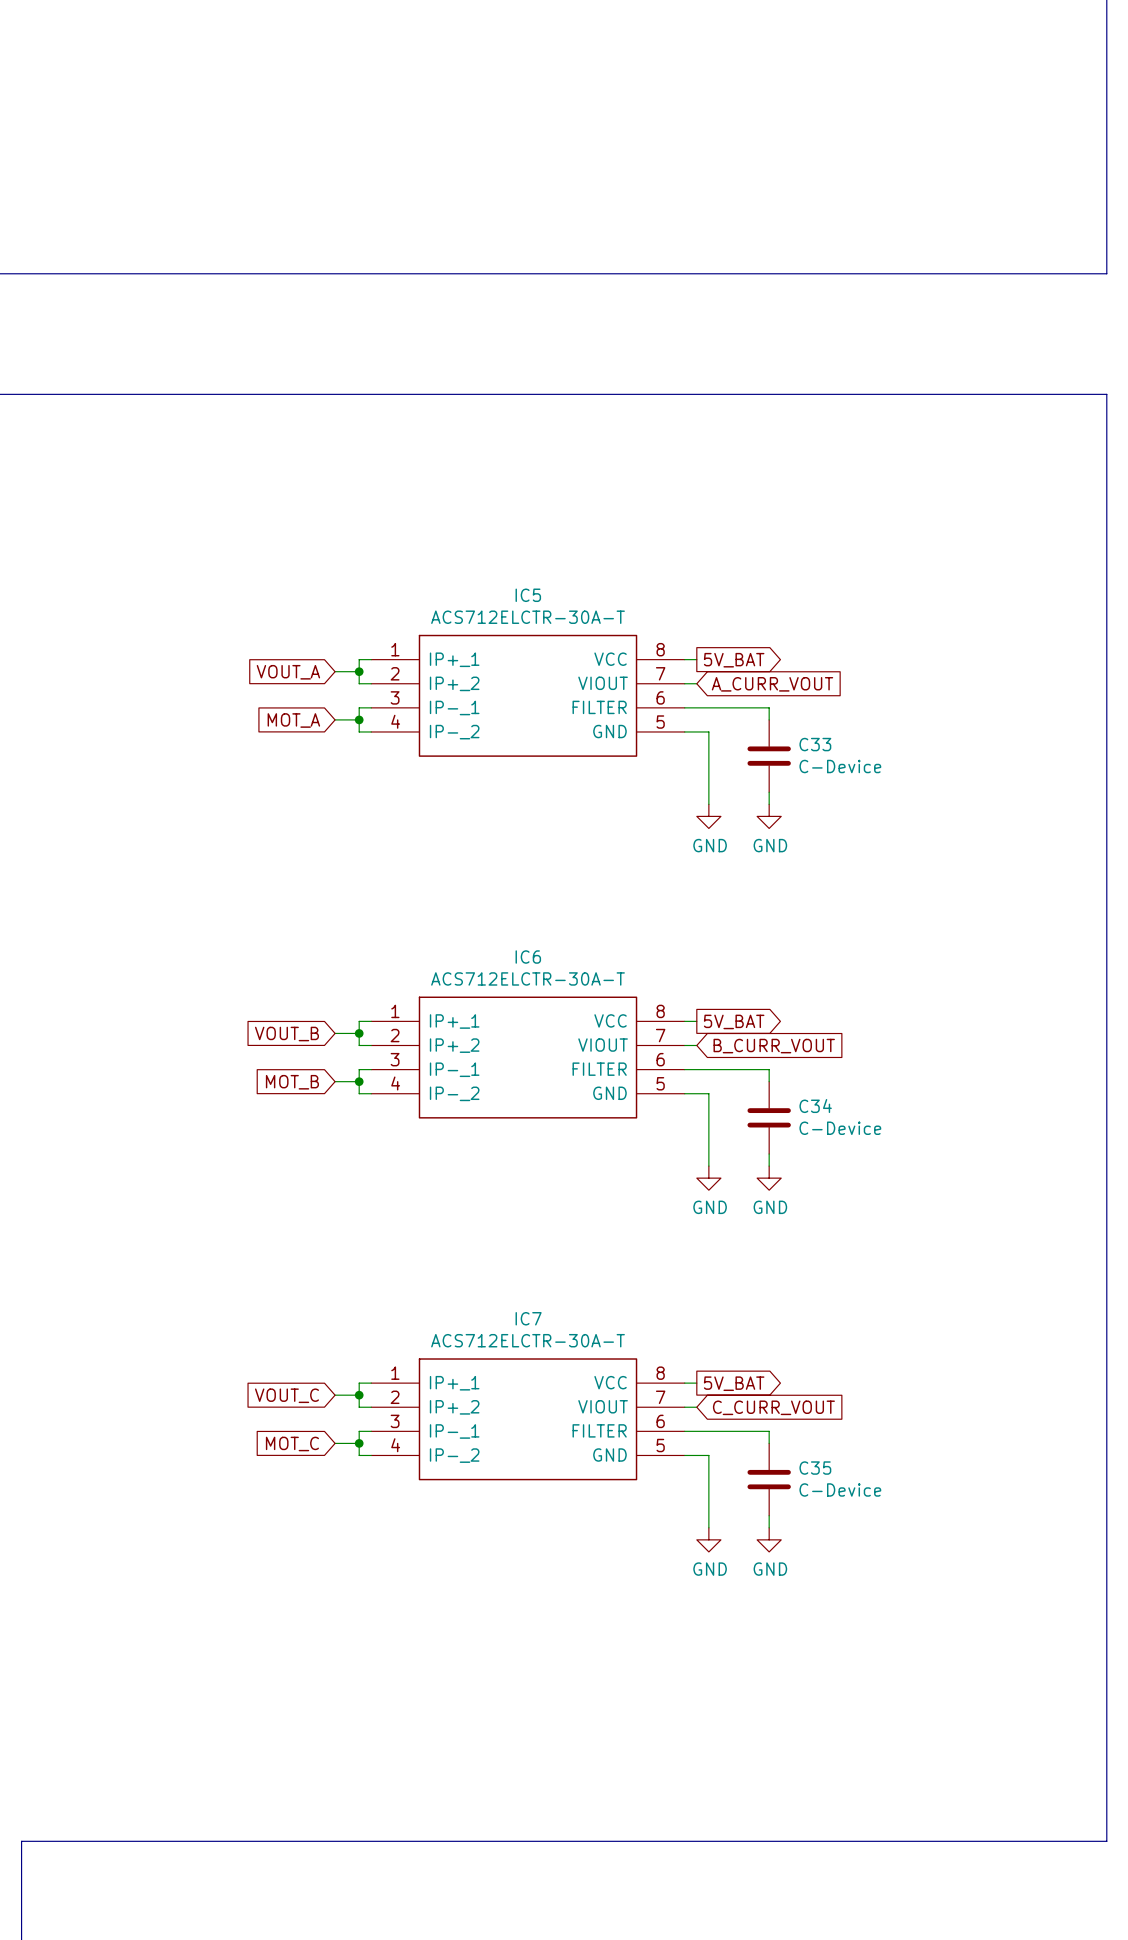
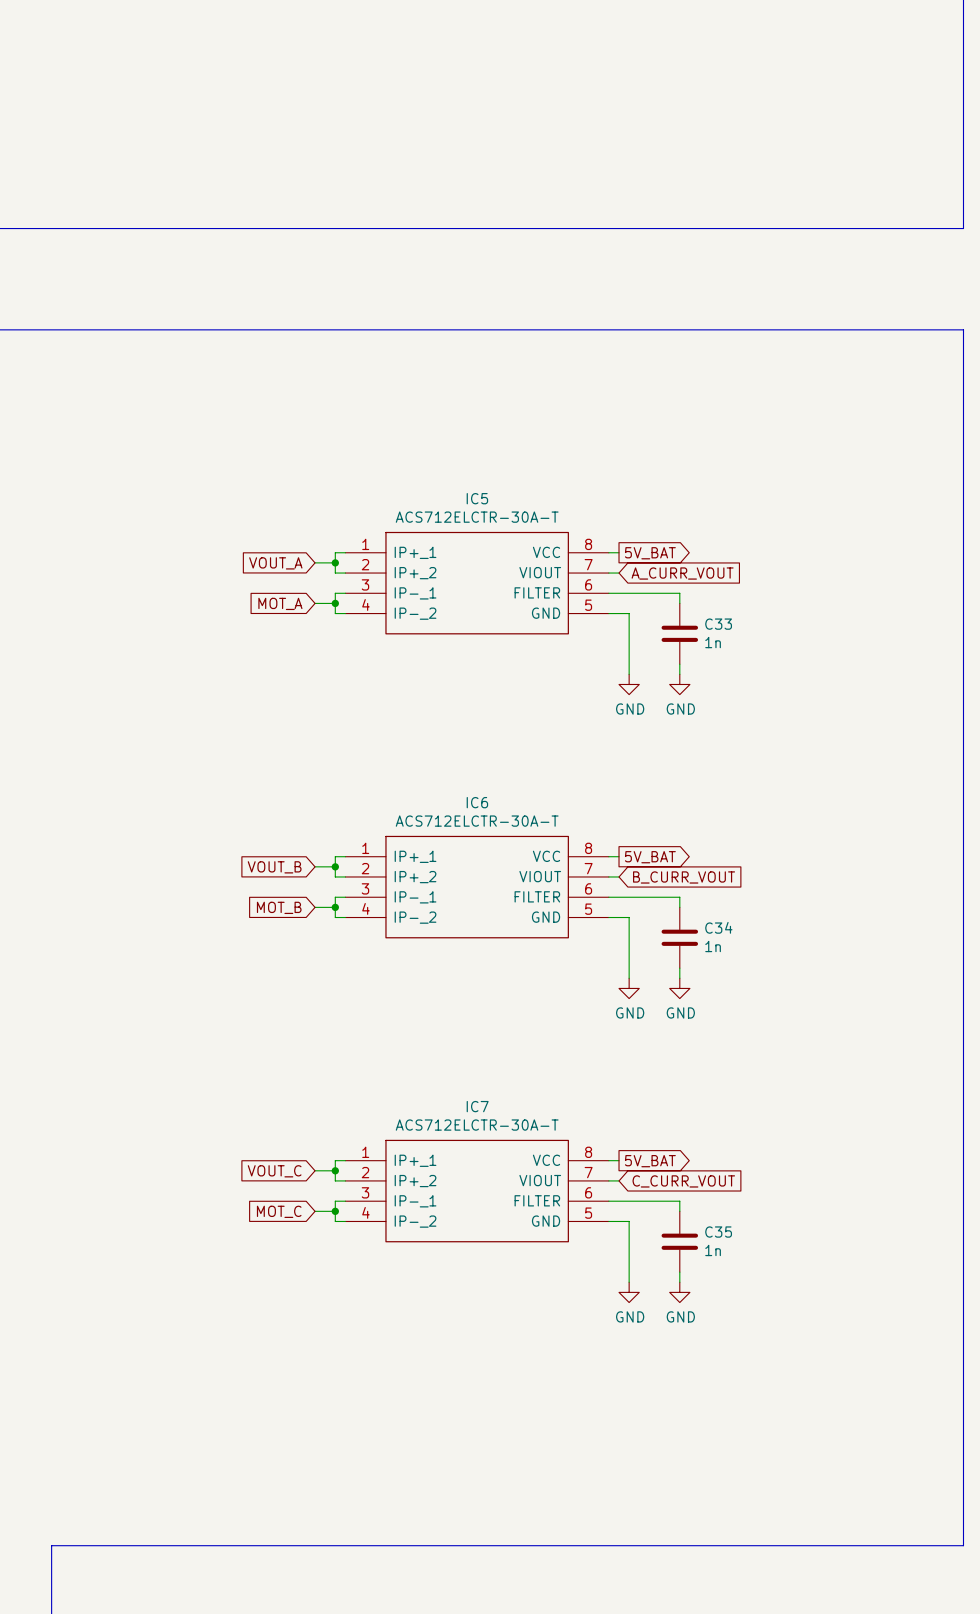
C33 value: C-Device (840, 766) -> 1n (713, 642)
C34 value: C-Device (840, 1128) -> 1n (713, 946)
C35 value: C-Device (840, 1489) -> 1n (713, 1250)

